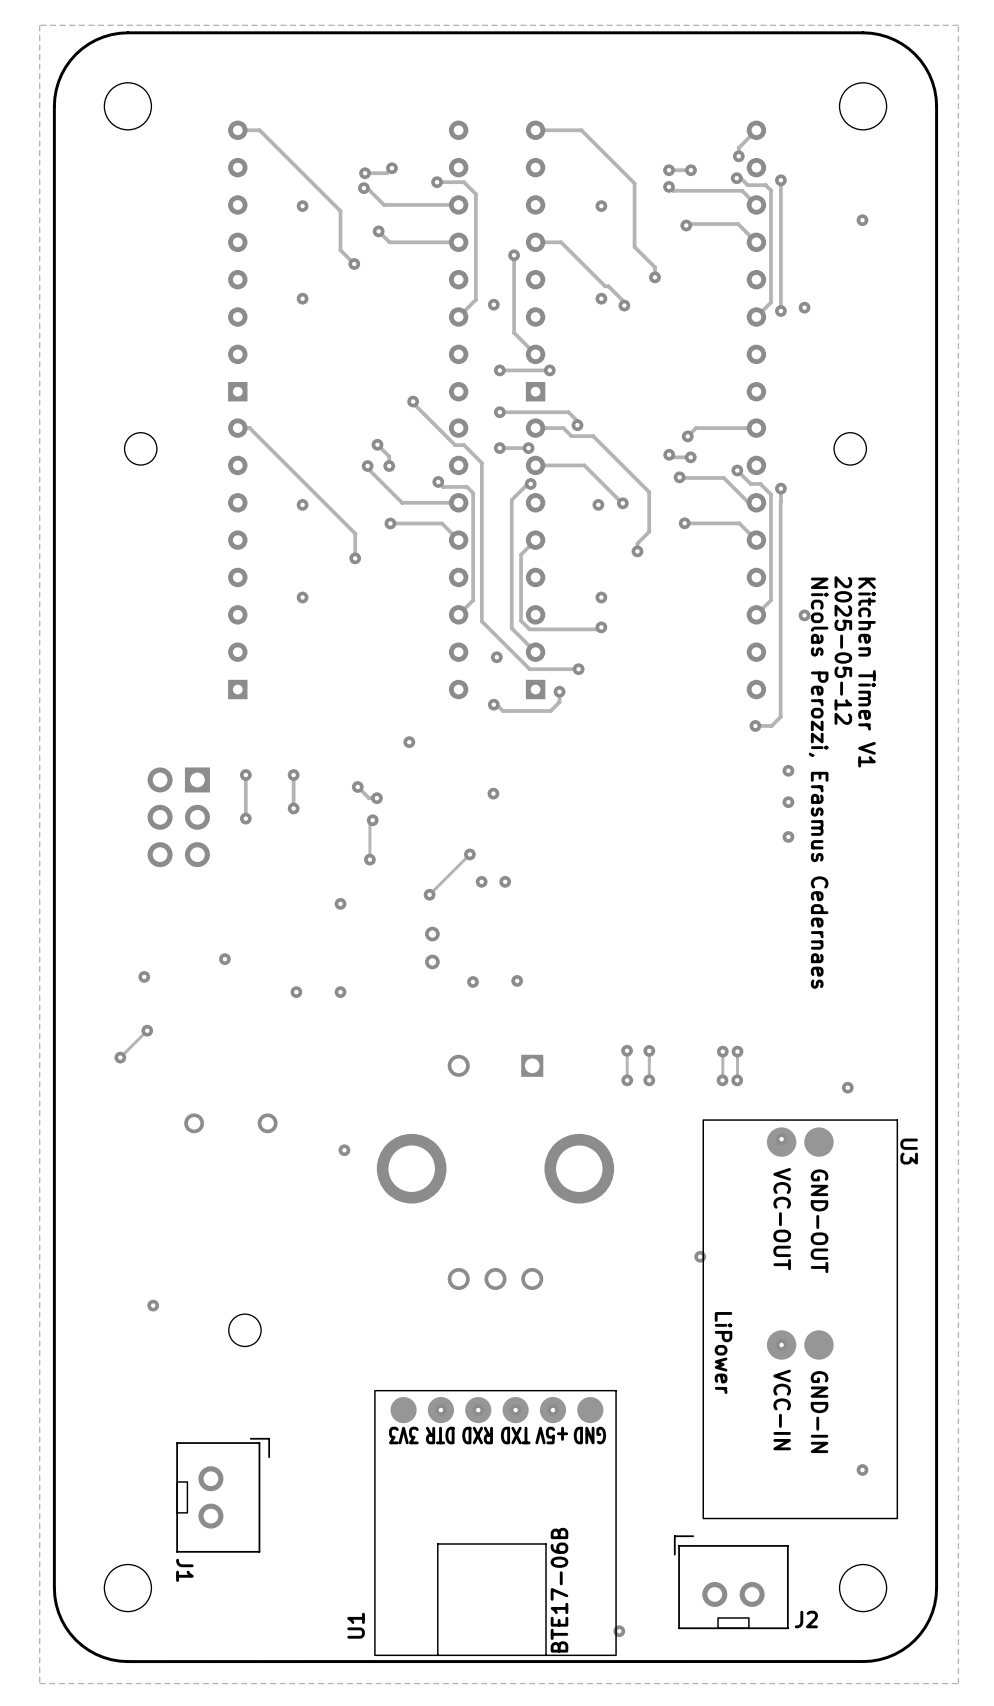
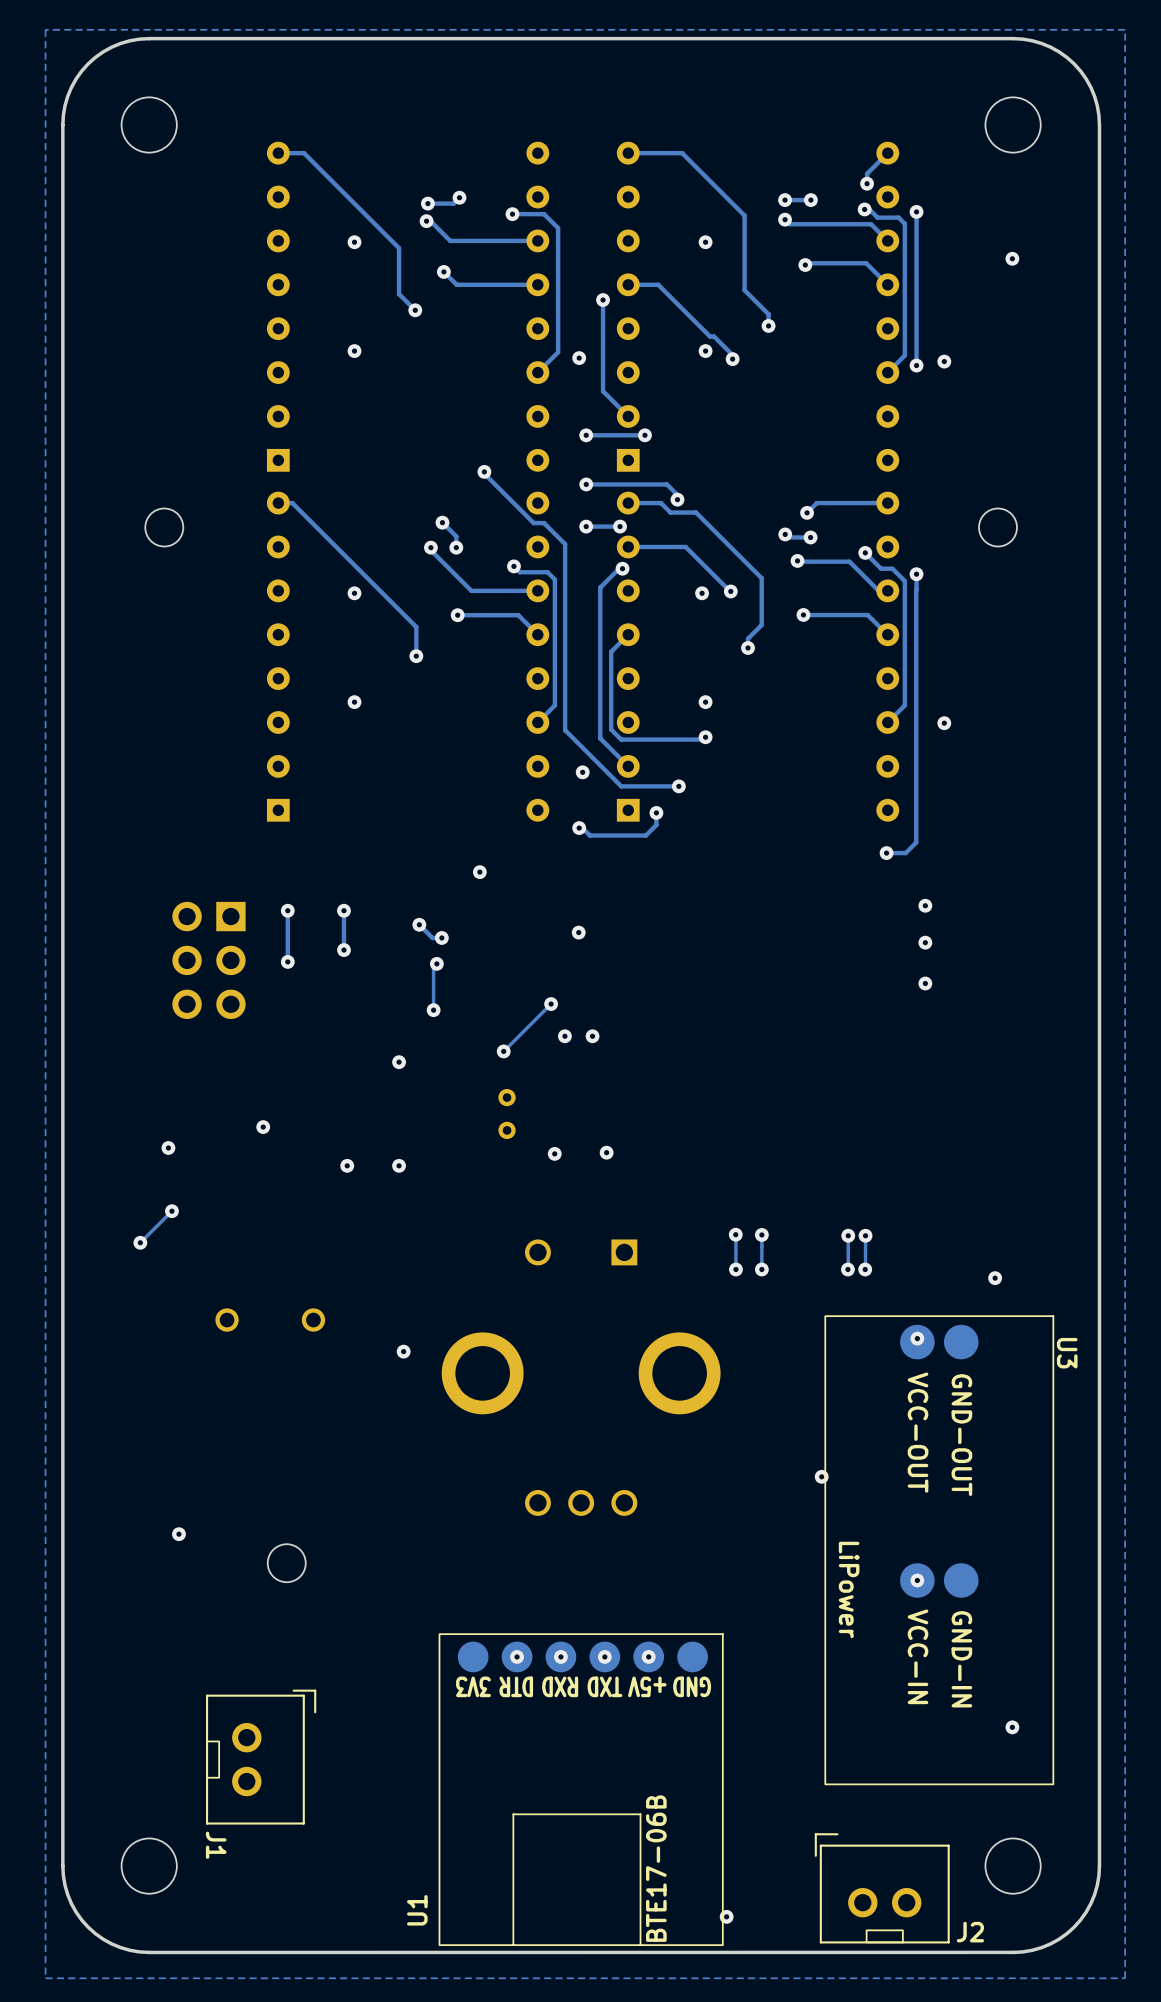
text: 2025-05-12 (843, 650) -> none
text: Kitchen Timer V1 (867, 672) -> none
text: Nicolas Perozzi, Erasmus Cedernaes (818, 783) -> none
J2 position: (731, 1582) -> (882, 1888)

